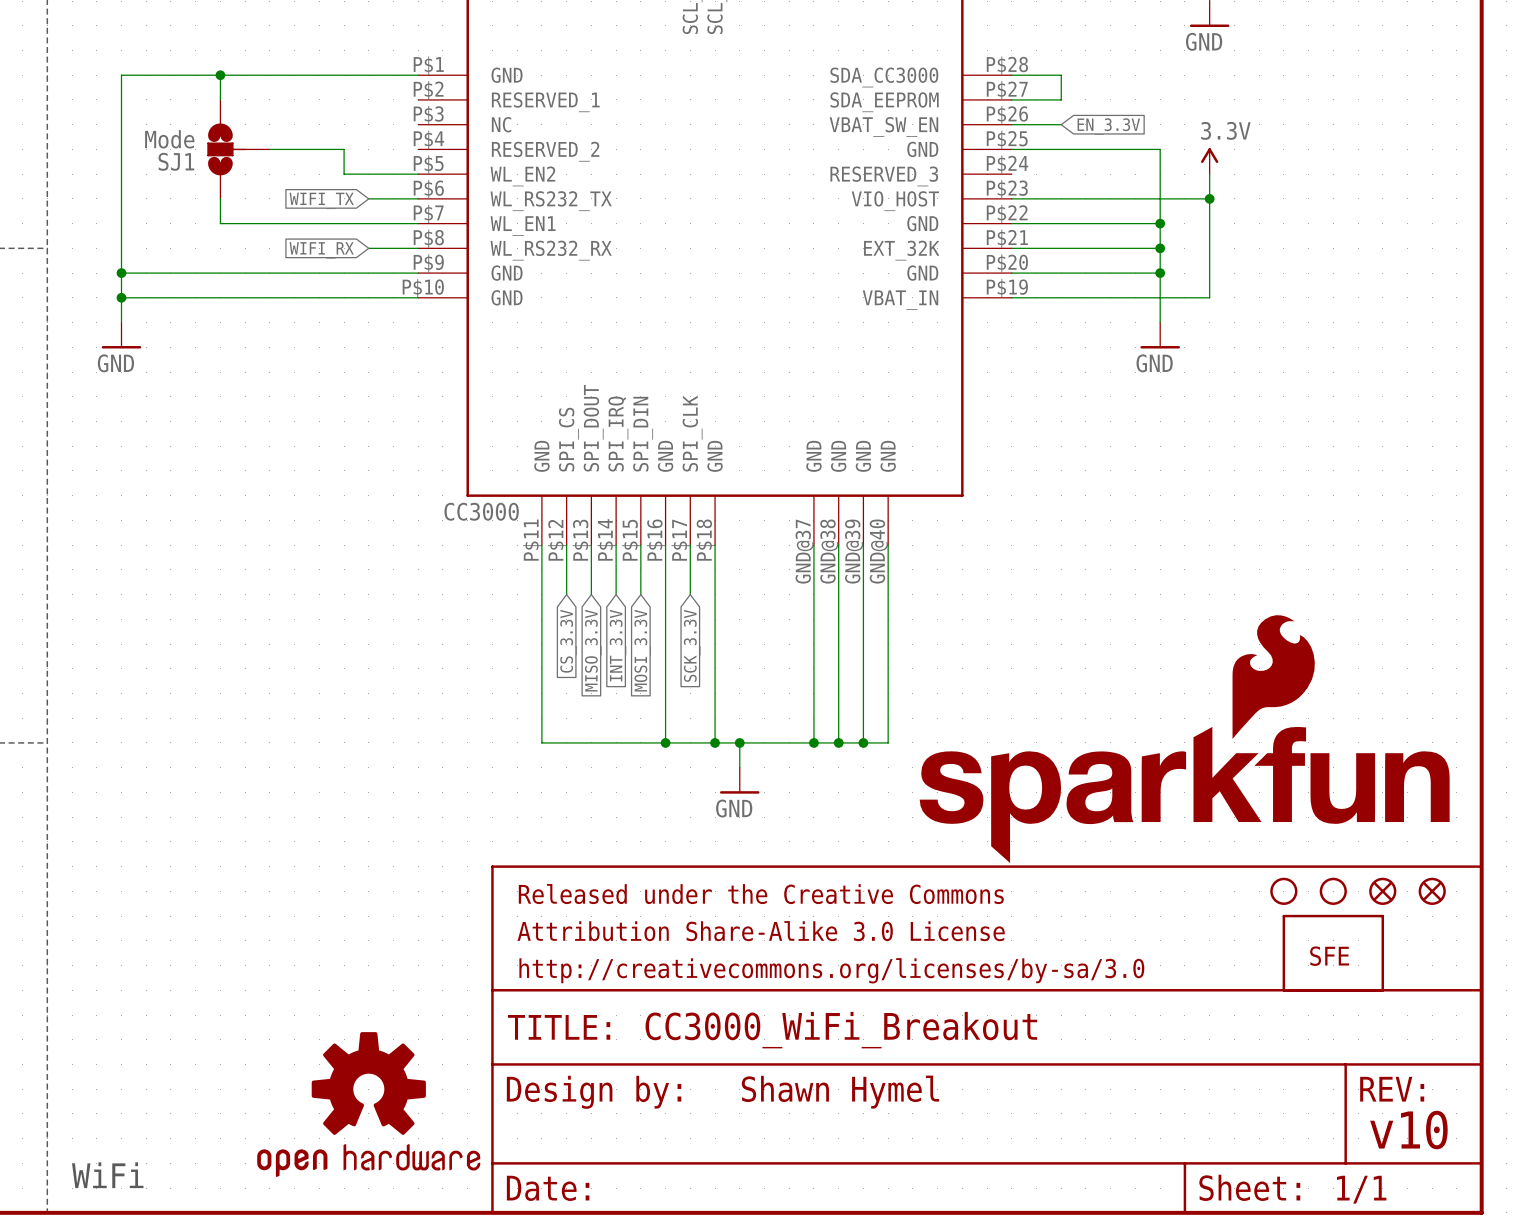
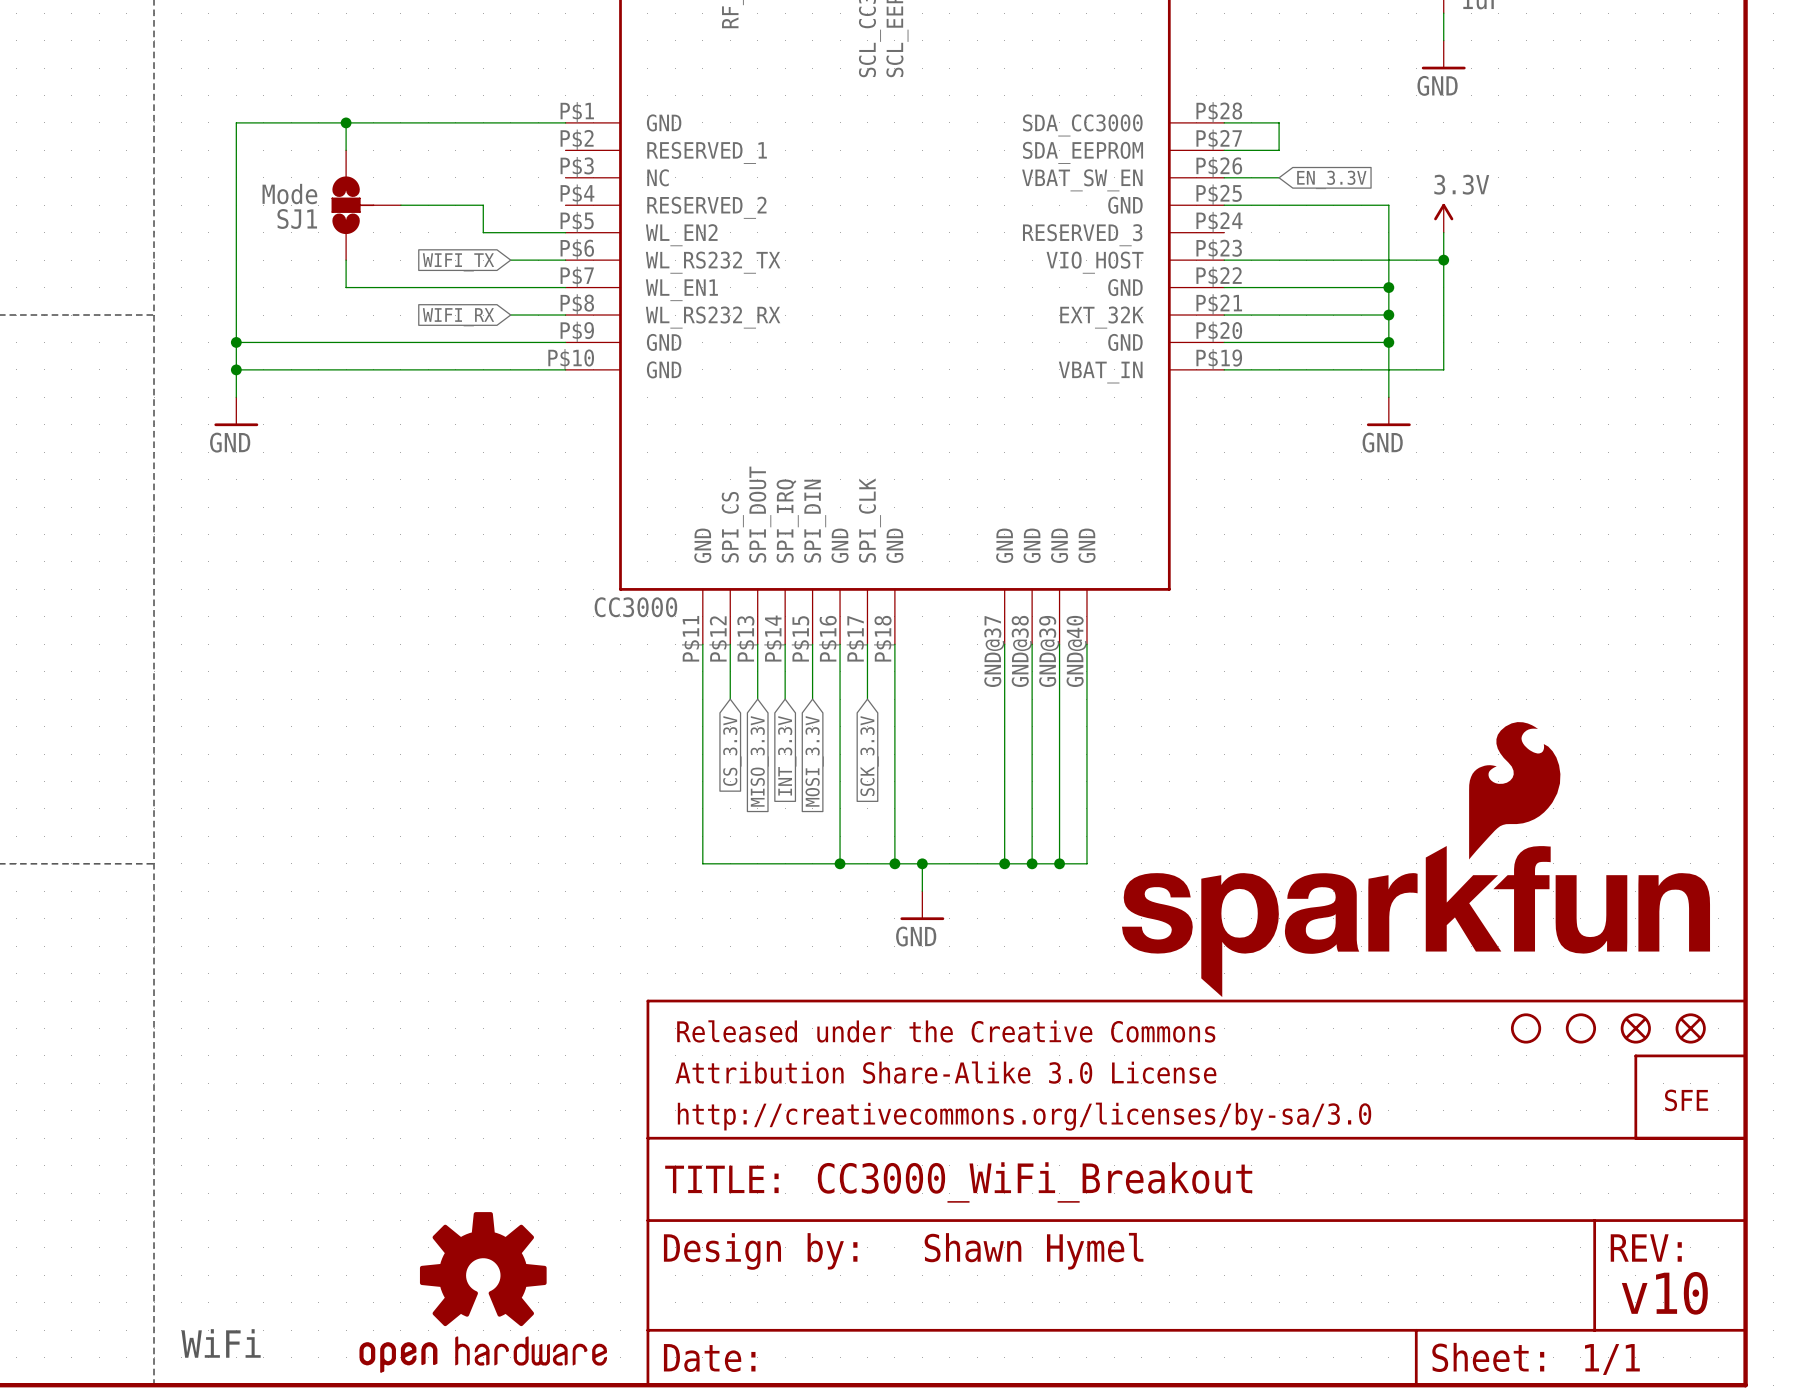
part position: (1333, 953) -> (1690, 1097)
part position: (368, 1104) -> (483, 1292)

